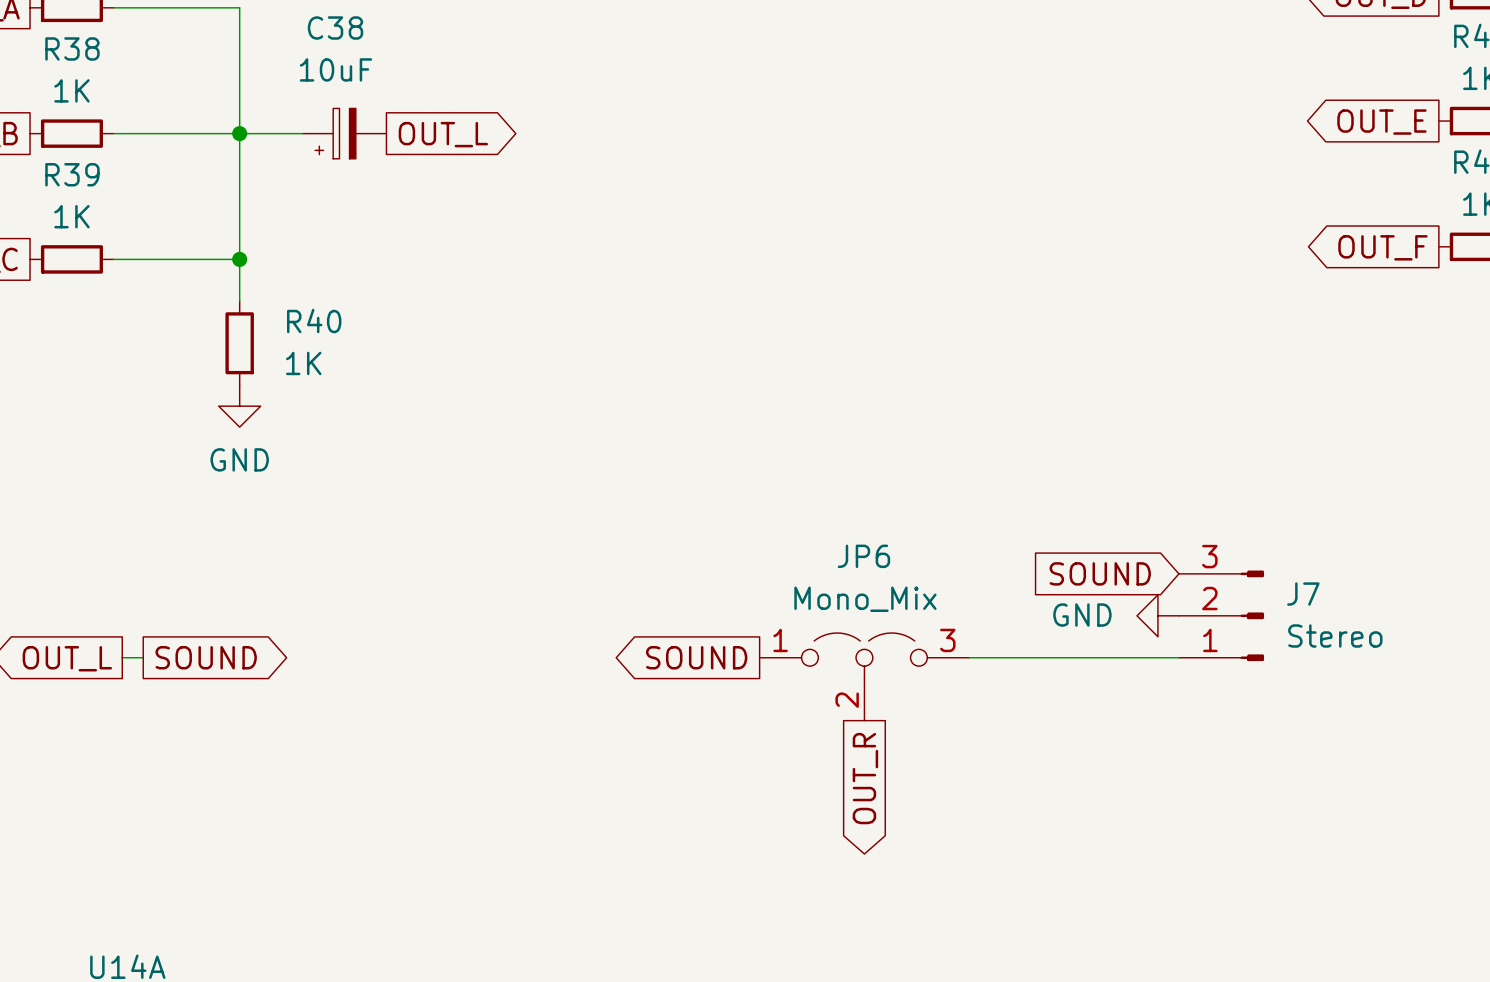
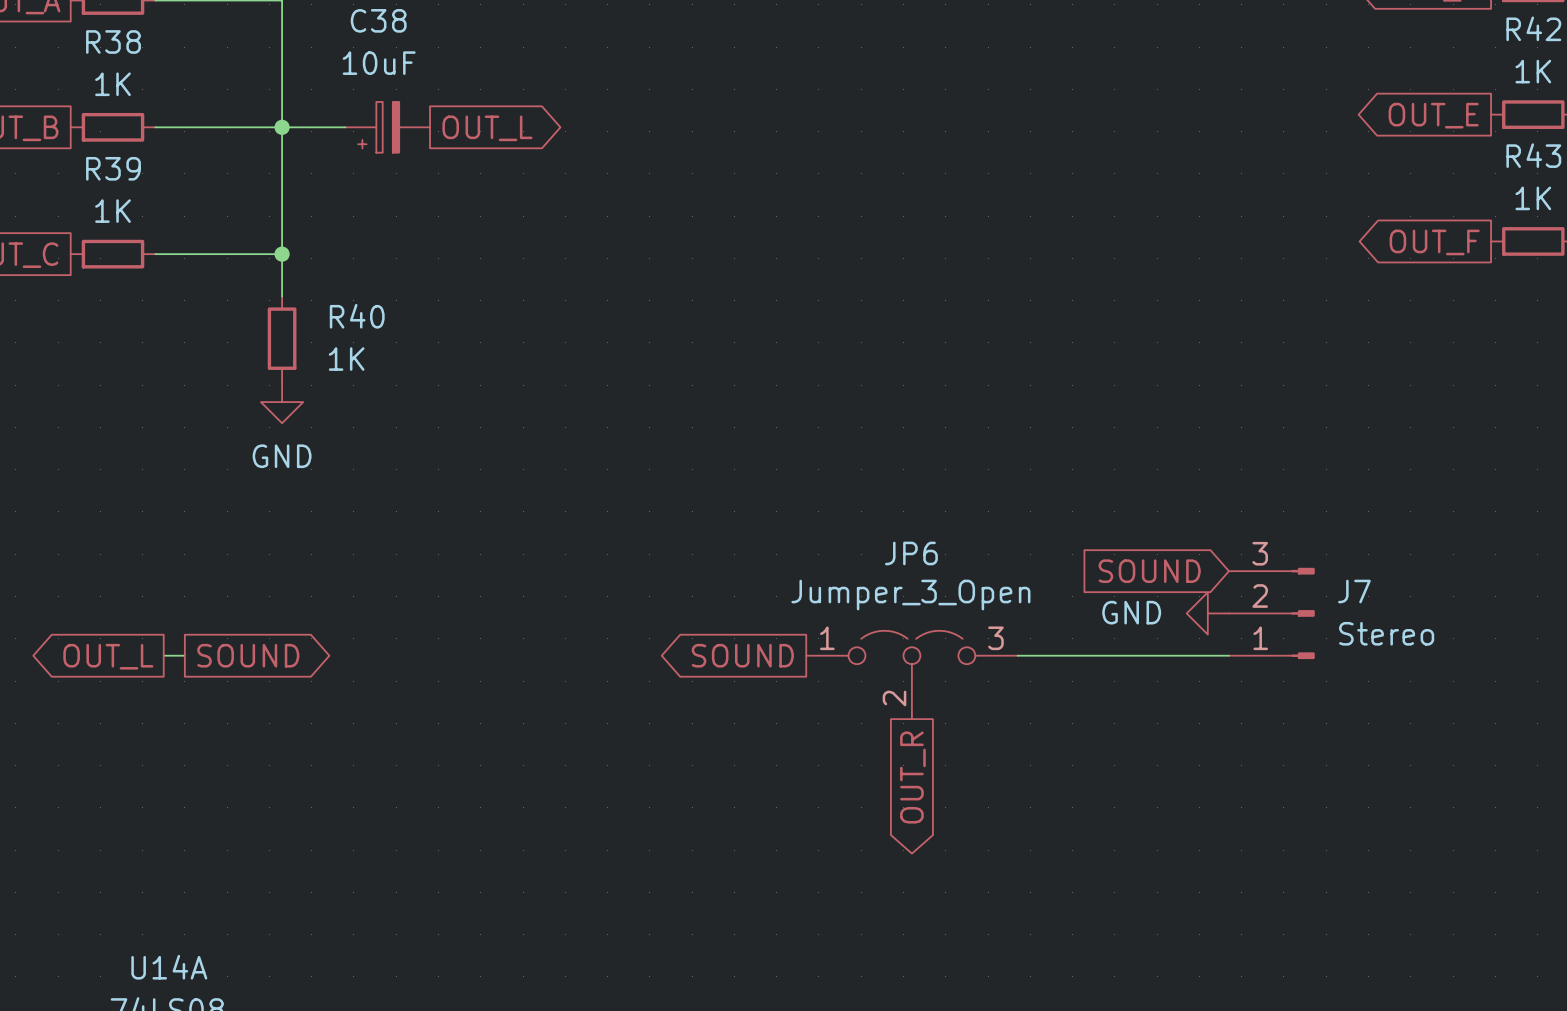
JP6 value: Mono_Mix (865, 599) -> Jumper_3_Open (910, 595)

